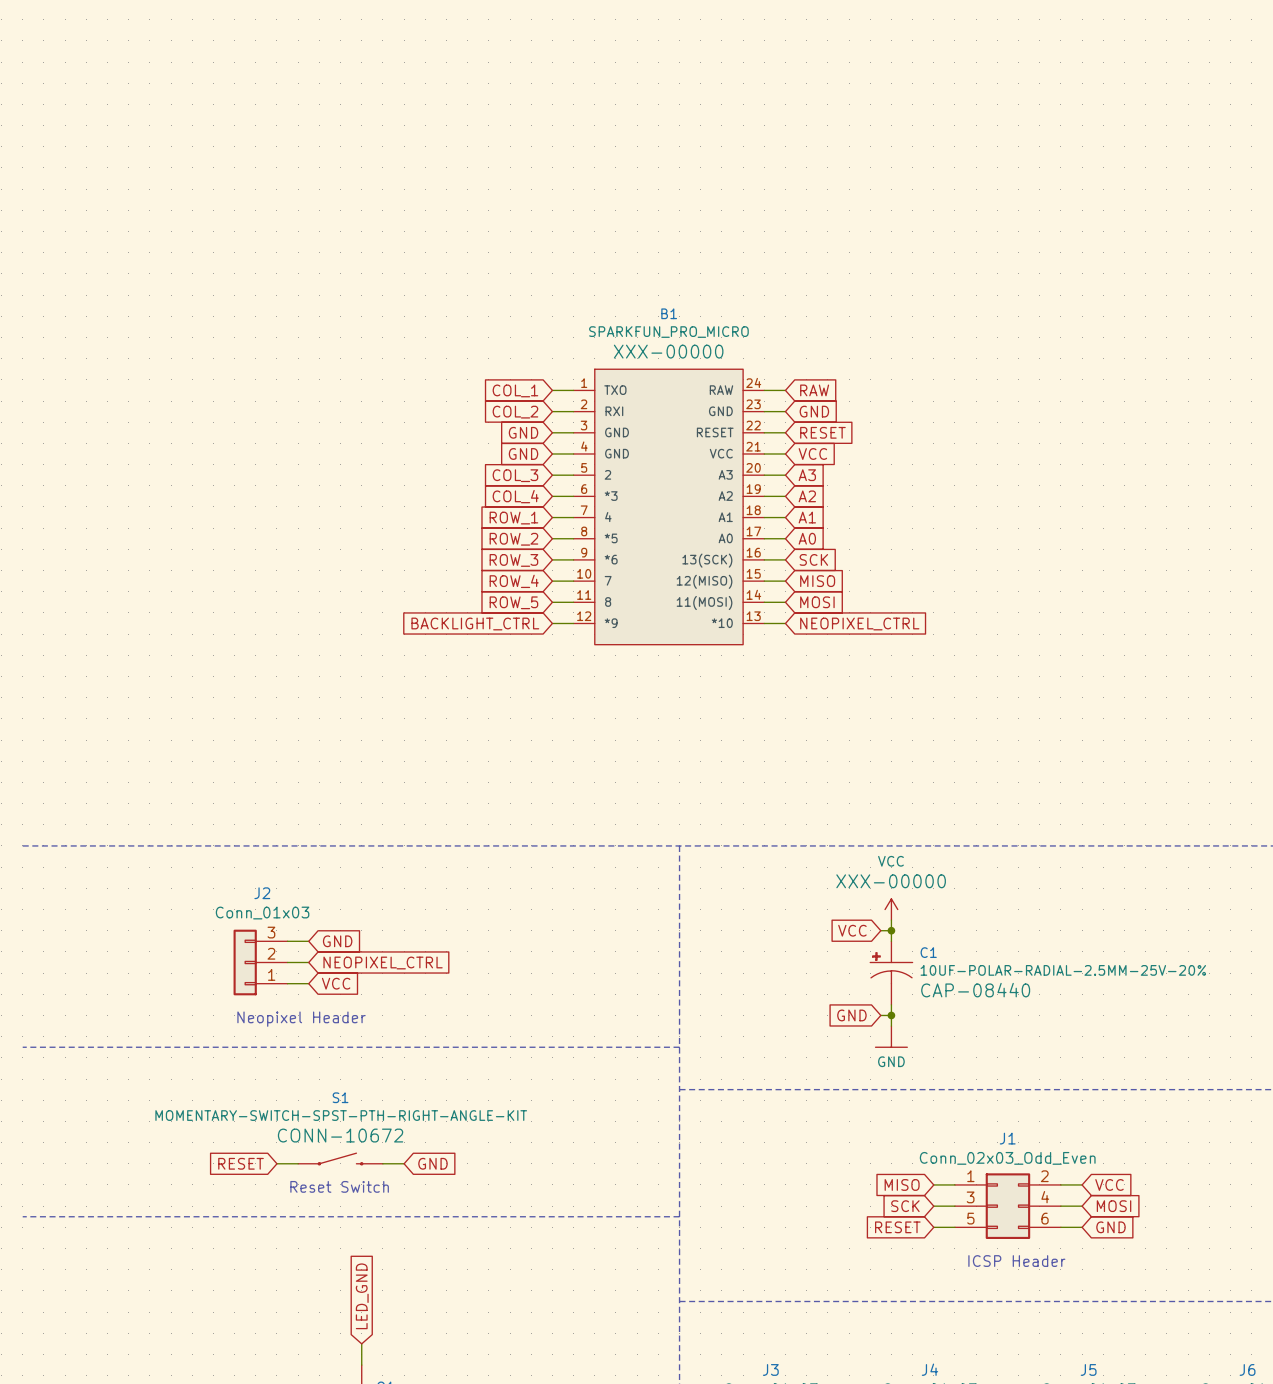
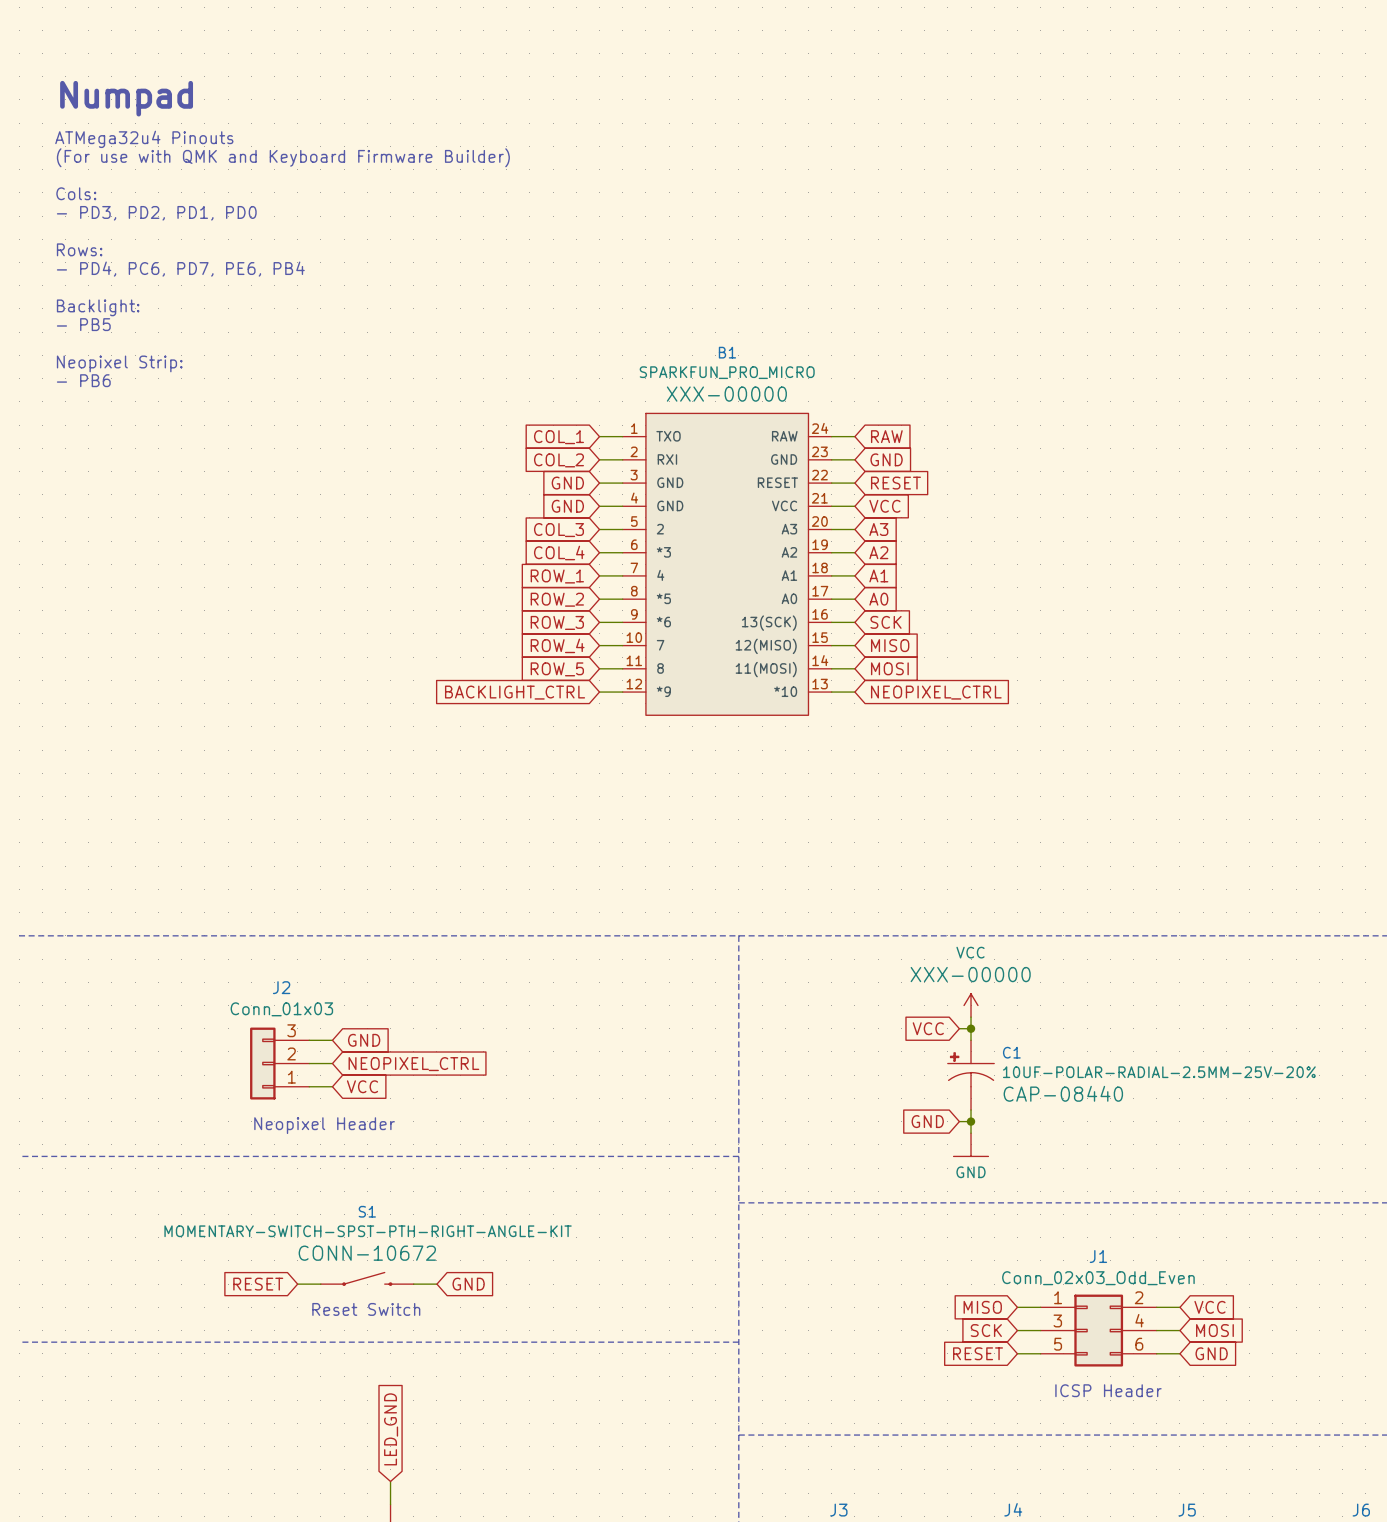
text: none -> Numpad (126, 98)
text: none -> ATMega32u4 Pinouts (144, 139)
text: none -> (For use with QMK and Keyboard Firmware Builder) (283, 157)
text: none -> Cols: (76, 193)
text: none -> - PD3, PD2, PD1, PD0 (156, 213)
text: none -> Rows: (79, 249)
text: none -> - PD4, PC6, PD7, PE6, PB4 (180, 269)
text: none -> Backlight: (98, 307)
text: none -> - PB5 (83, 324)
text: none -> Neopixel Strip: (119, 363)
text: none -> - PB6 (83, 380)

